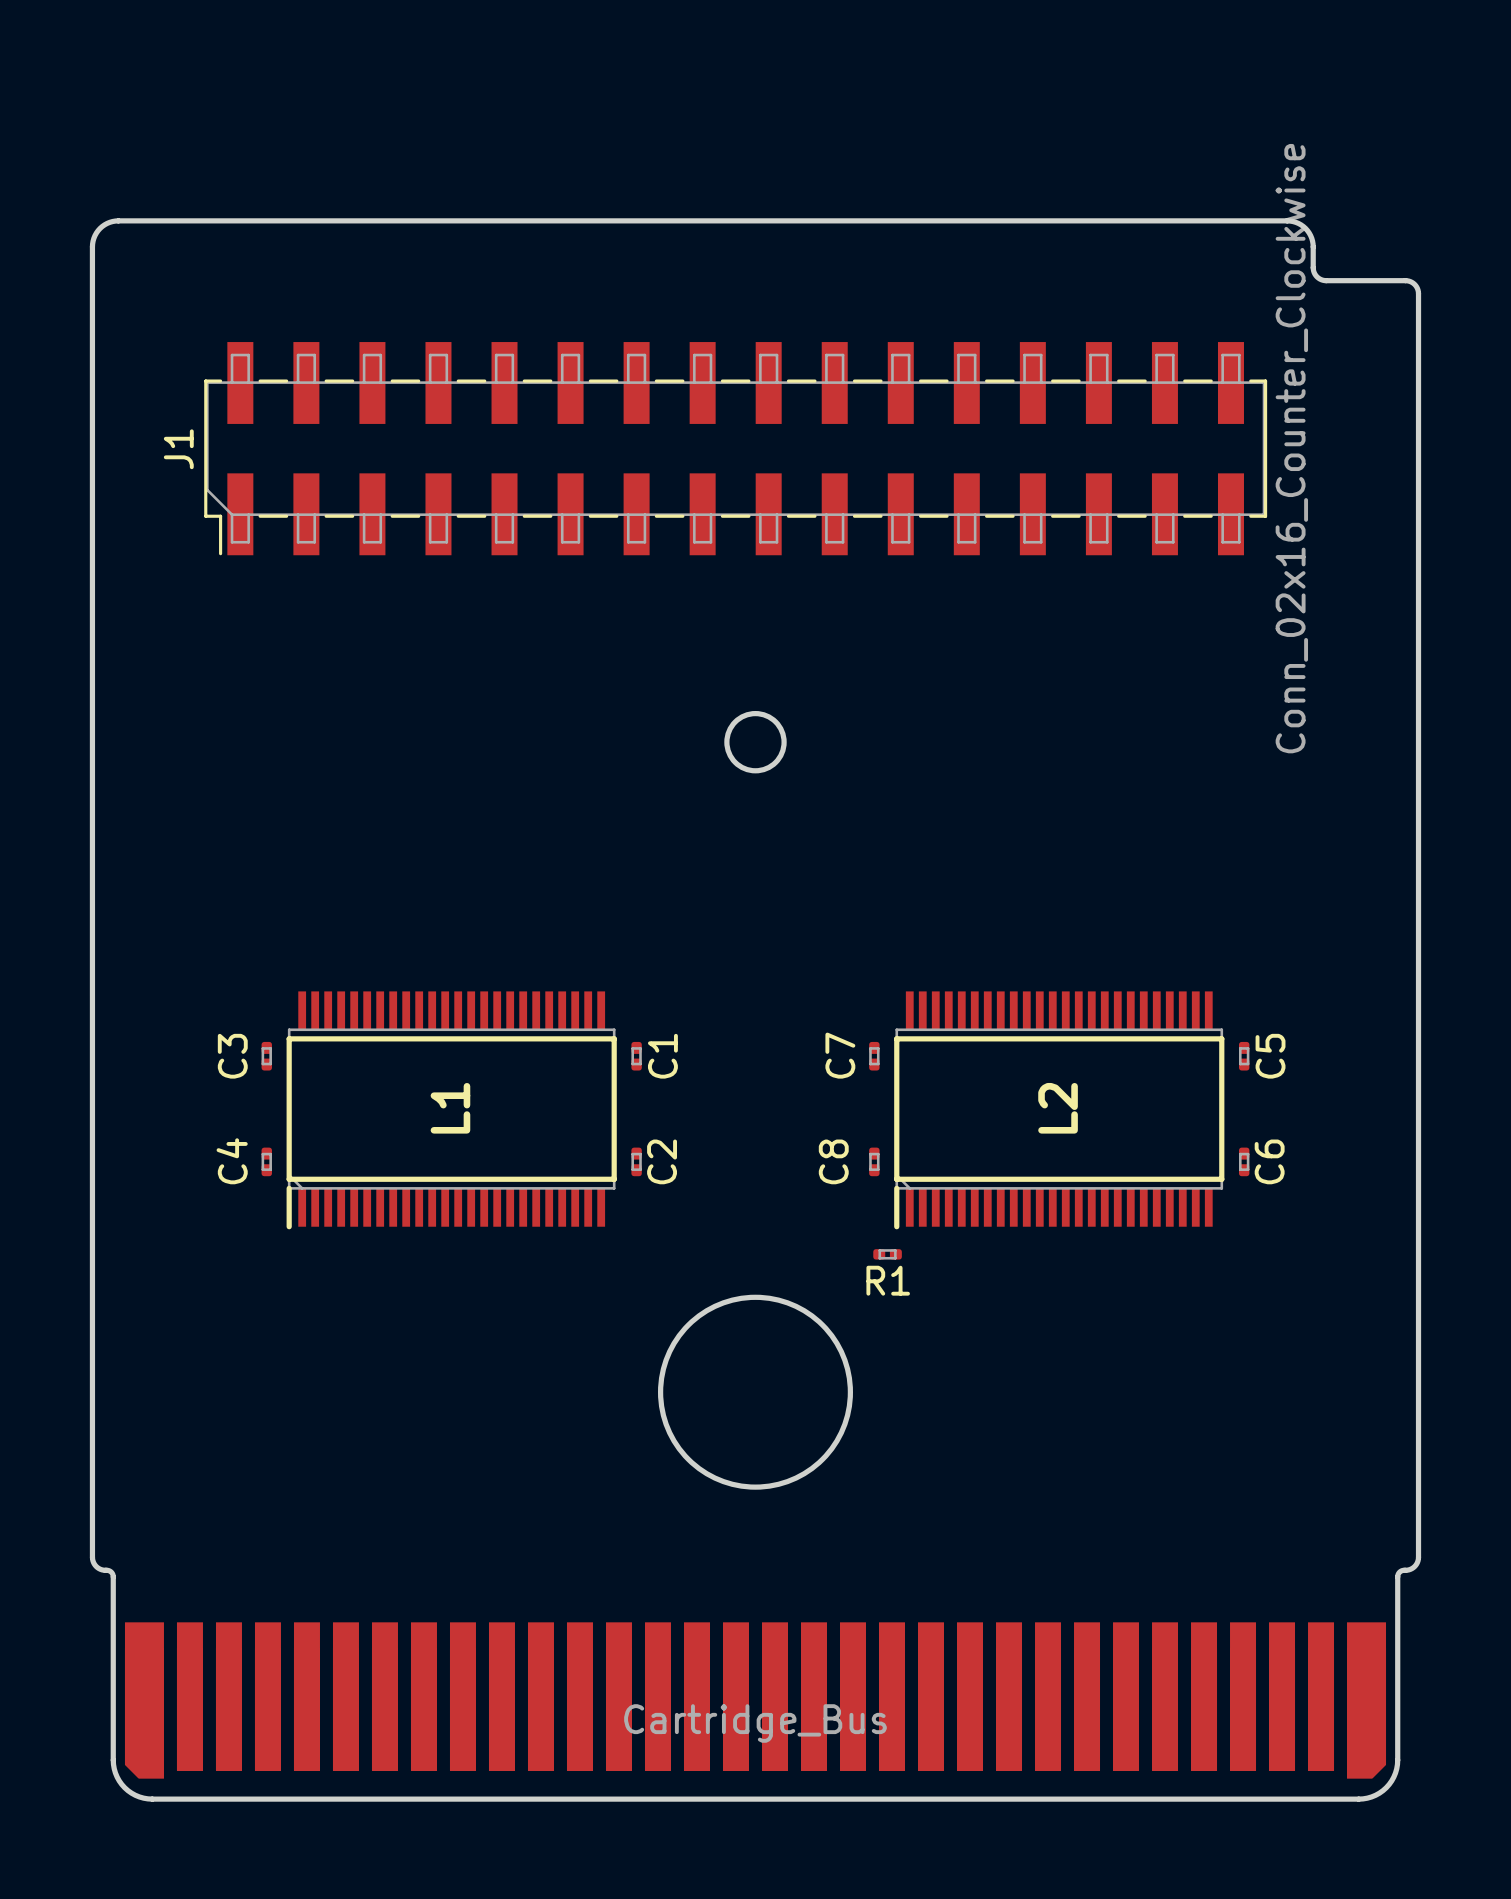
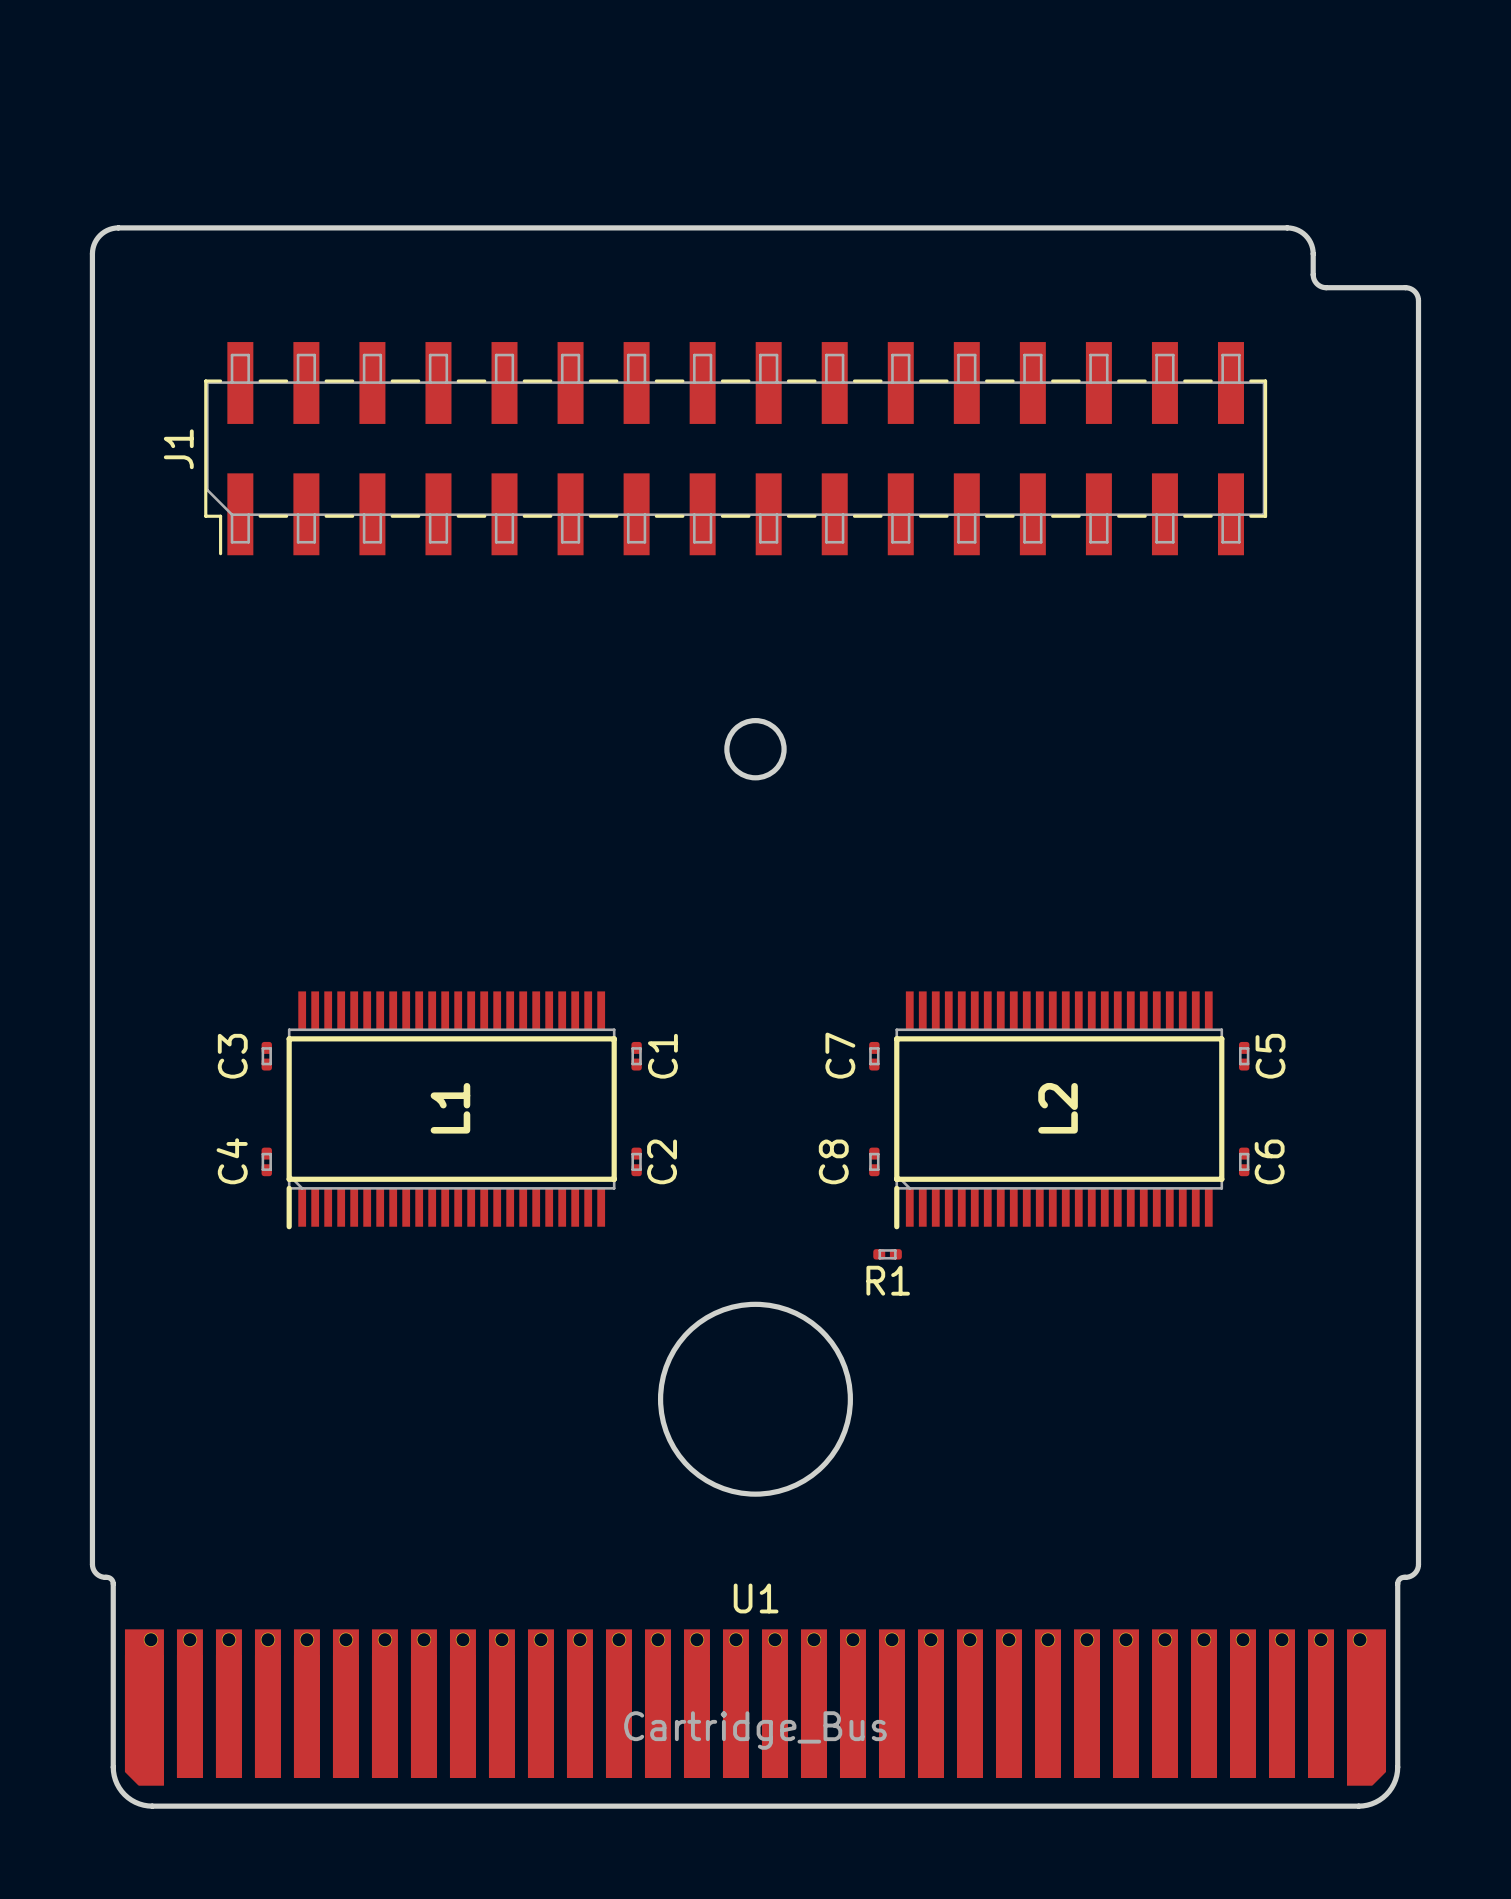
J1 value: Conn_02x16_Counter_Clockwise (1291, 448) -> none
part: Cartridge_Bus (755, 1010) -> none
U1: none -> Cartridge_Bus (755, 1017)

